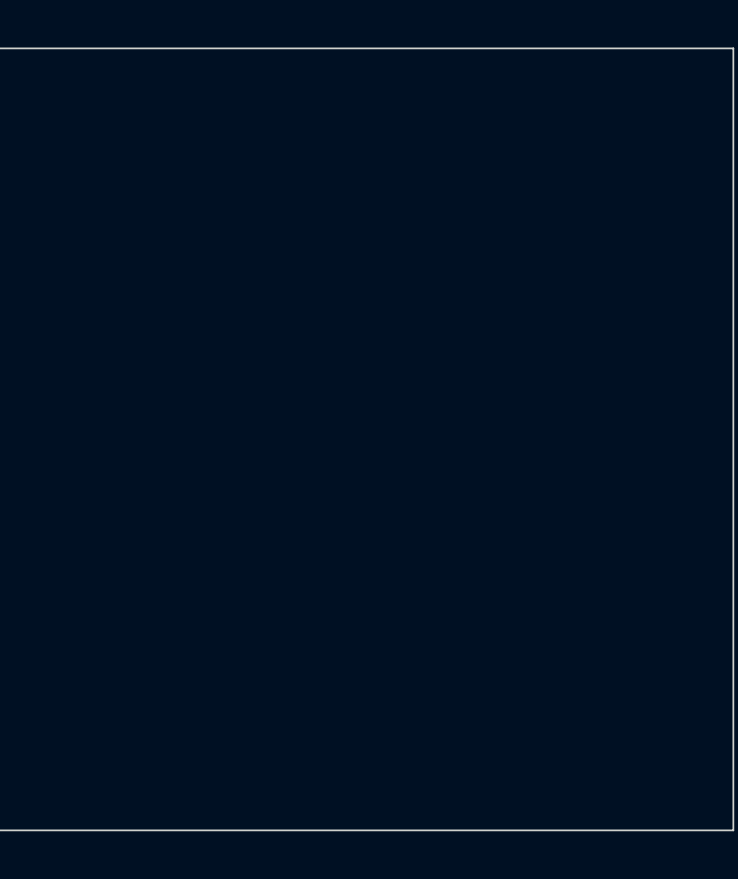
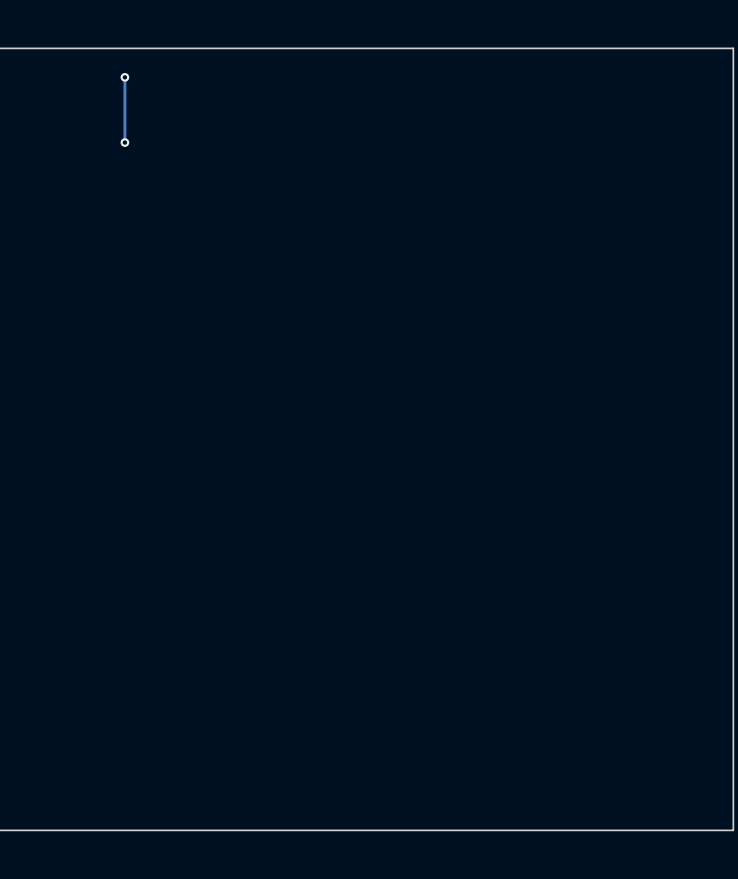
track: none -> (124, 77) (124, 142)
via: none -> (124, 77)
via: none -> (124, 142)

